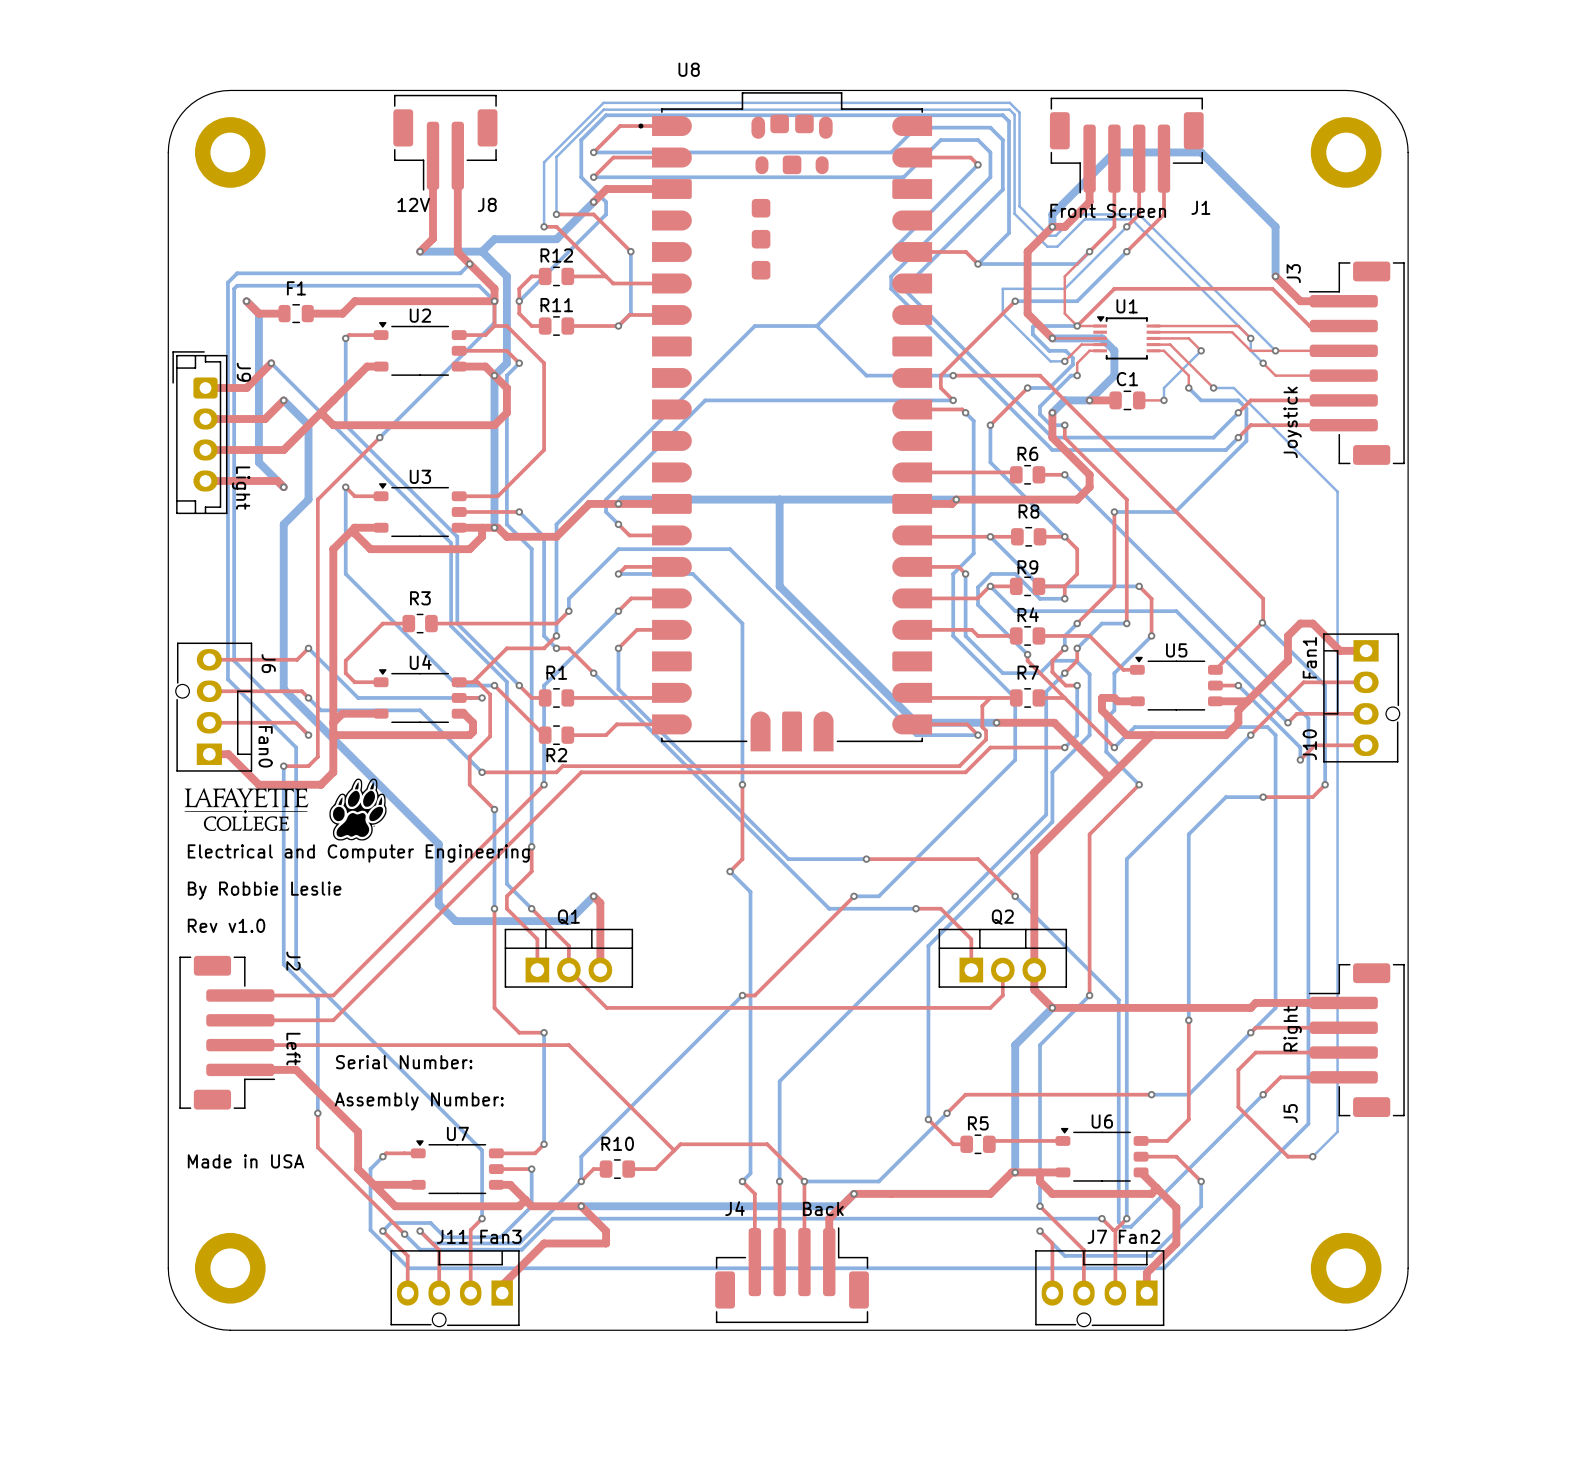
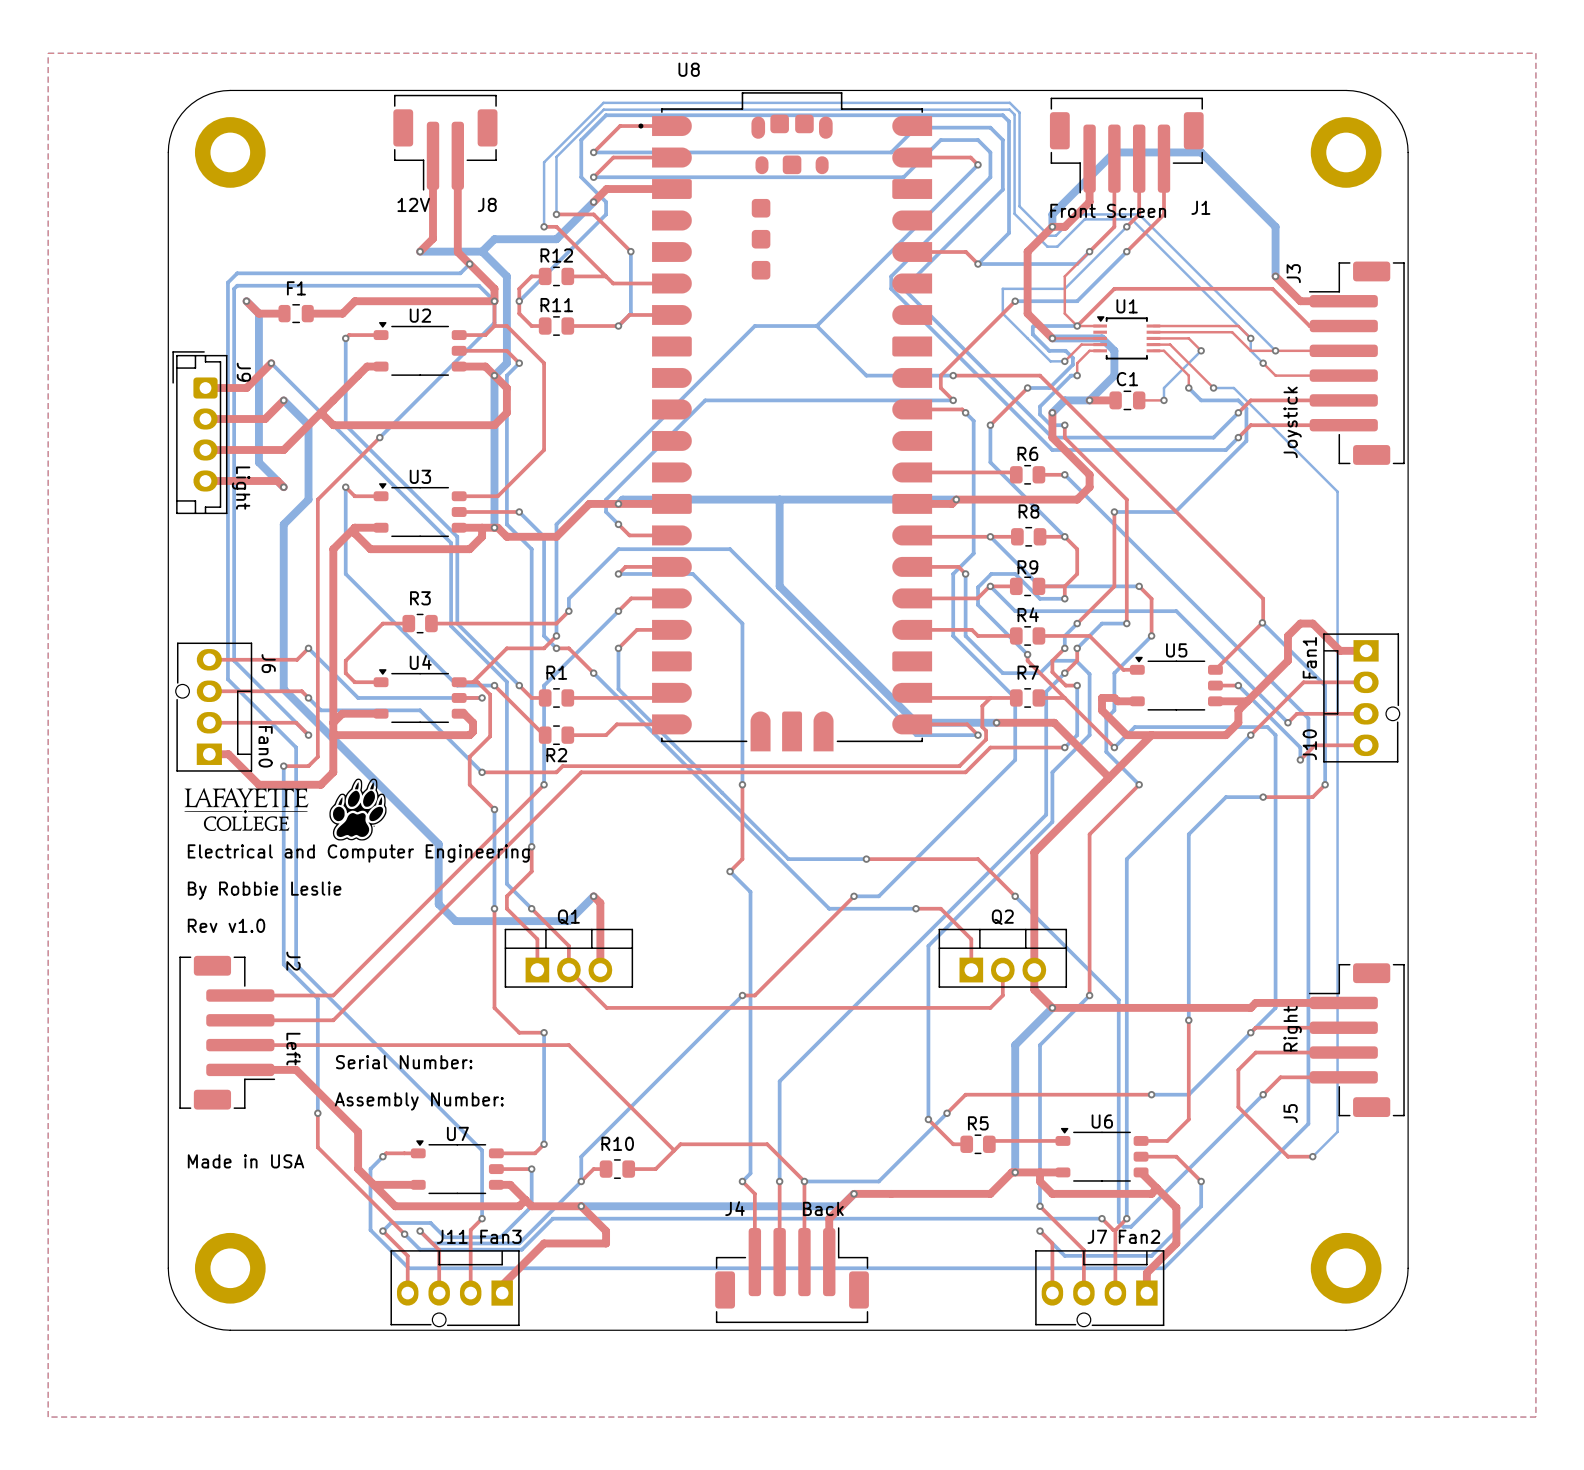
top zone outline: none -> (48, 53) (1535, 53) (1535, 1417) (48, 1417) (48, 53)

